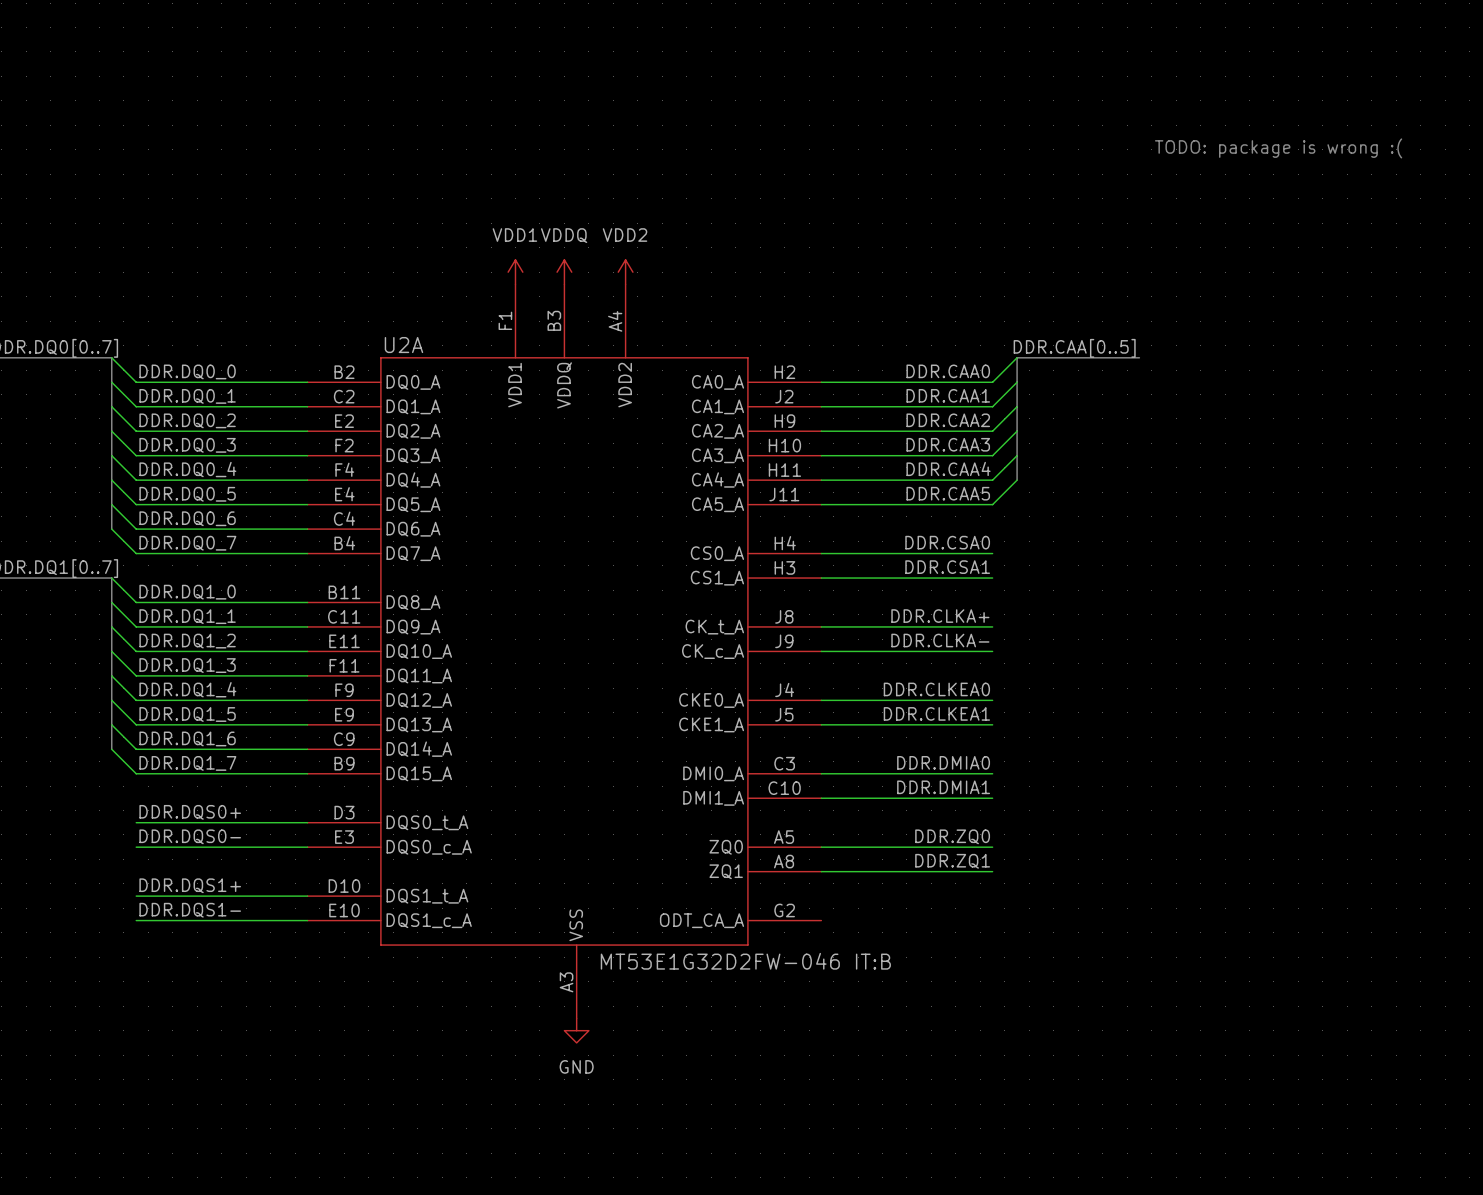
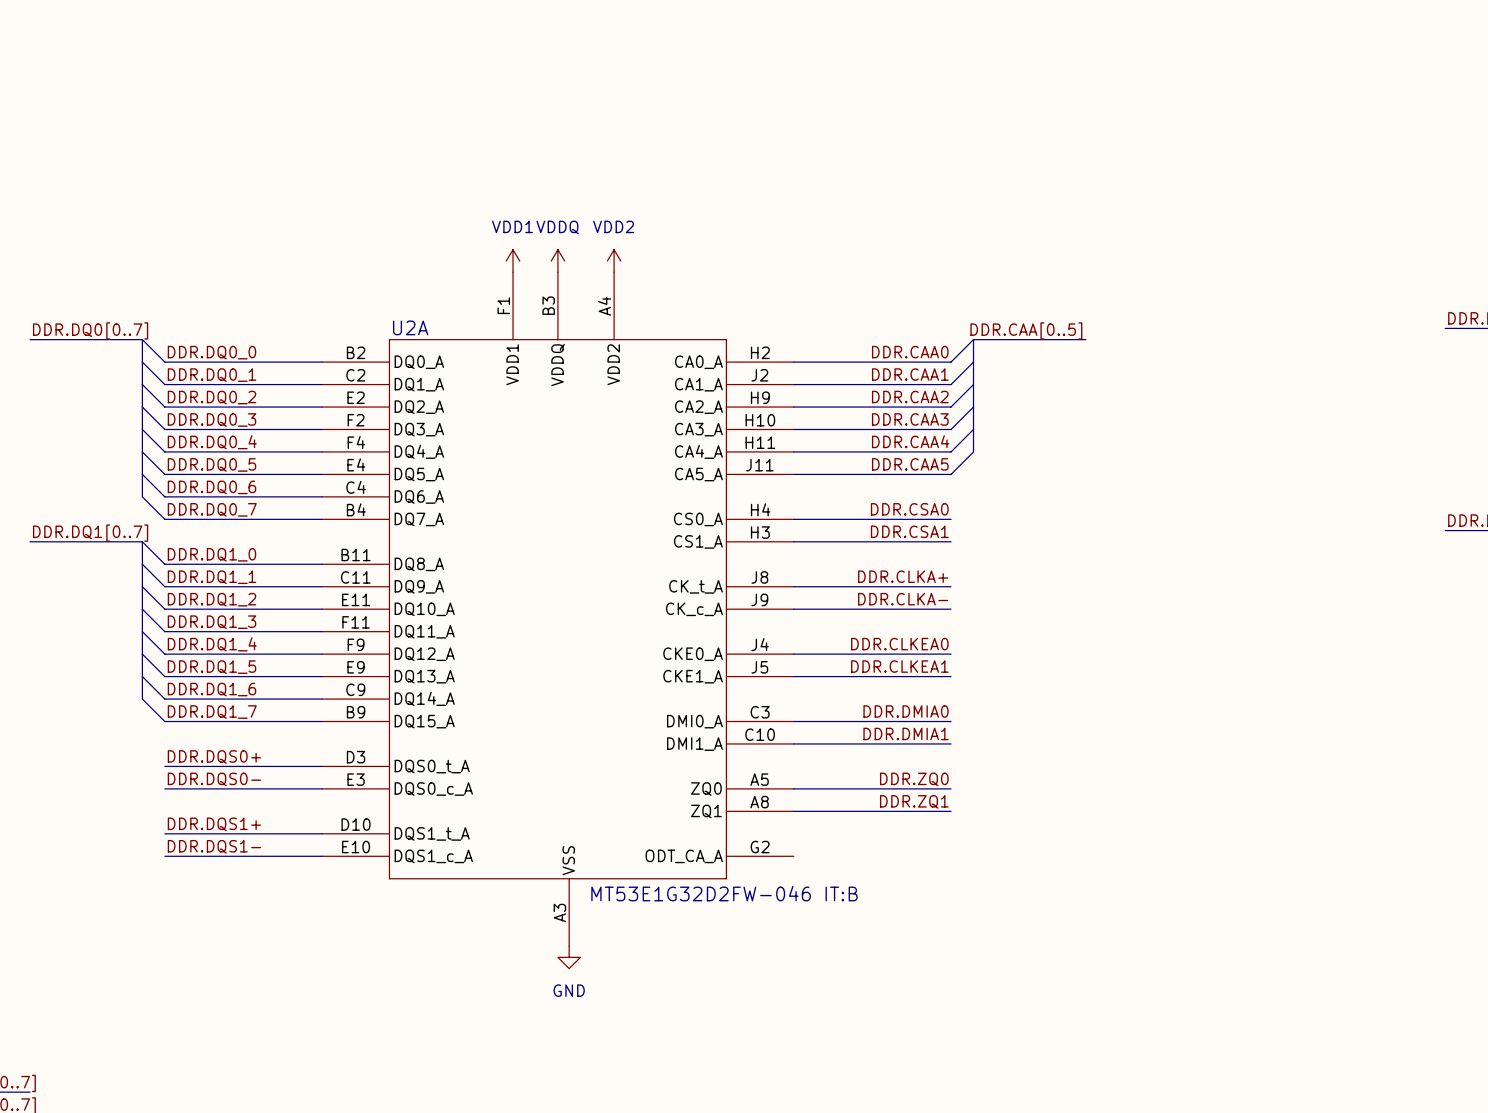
text: TODO: package is wrong :( (1278, 148) -> none

